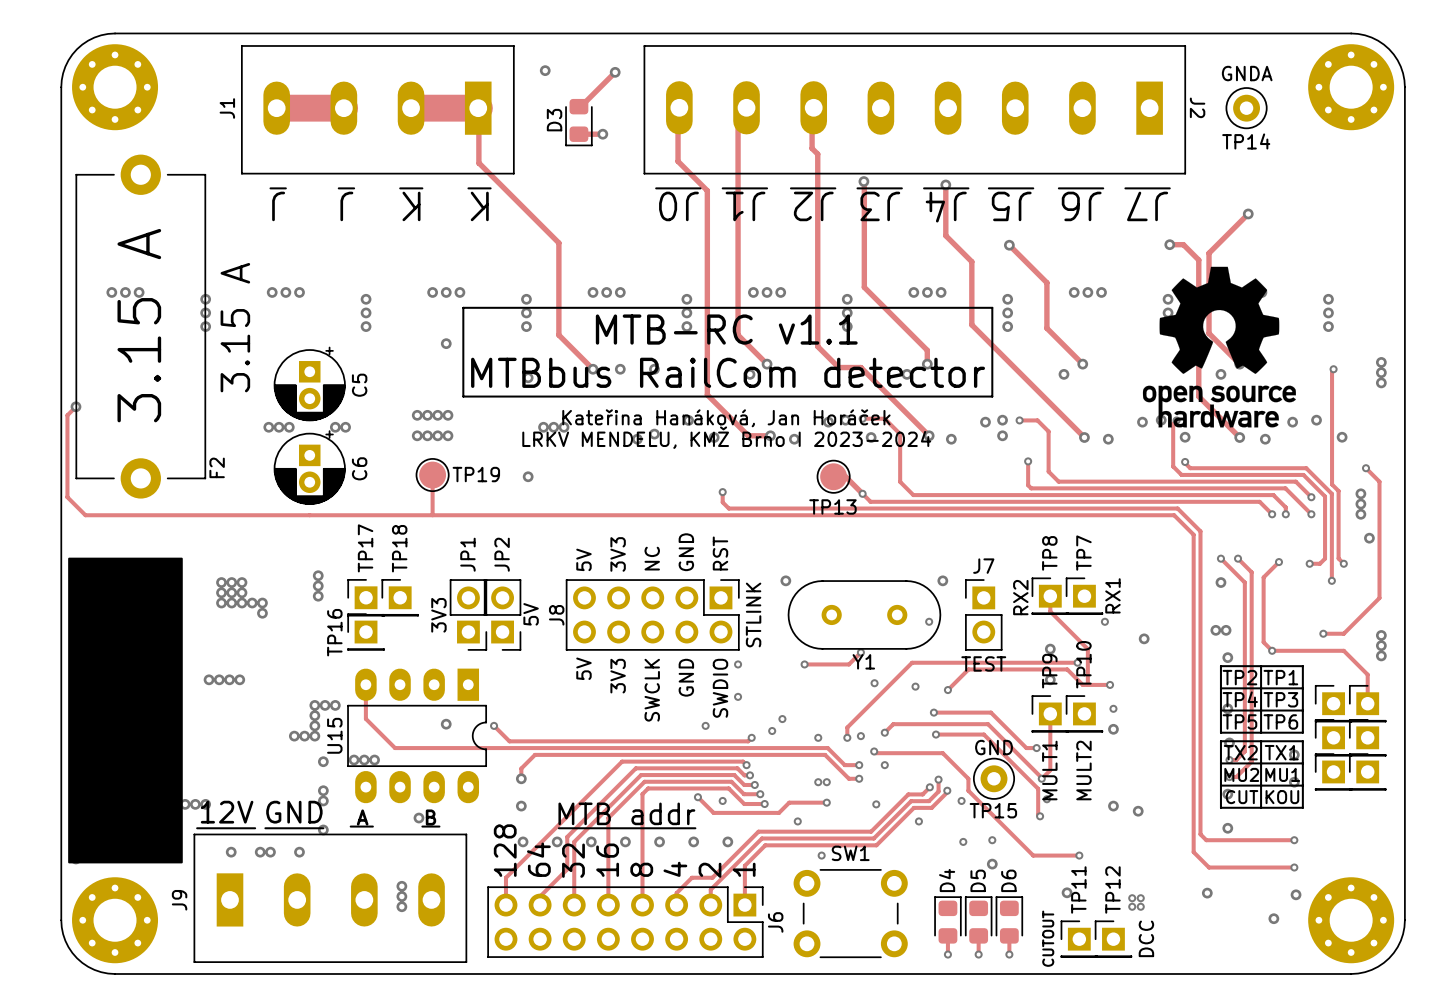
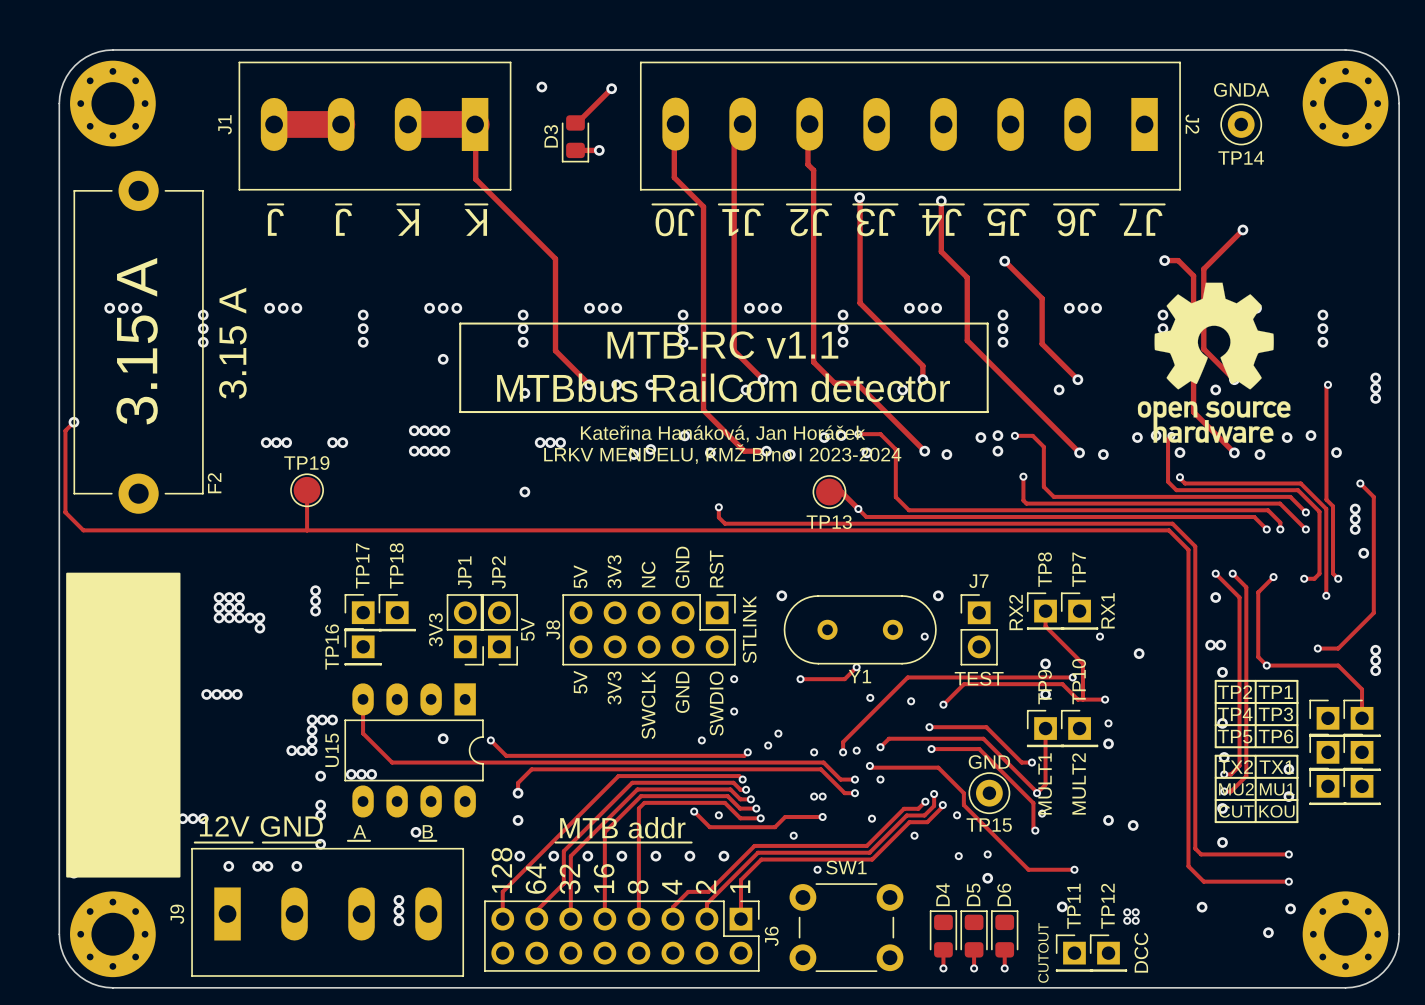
C5: (309, 383) -> none
C6: (309, 467) -> none
TP19 name position: TP19 (476, 474) -> TP19 (306, 463)
track: (432, 475) (432, 515) -> (307, 490) (307, 530)
TP19 position: (432, 475) -> (307, 490)

